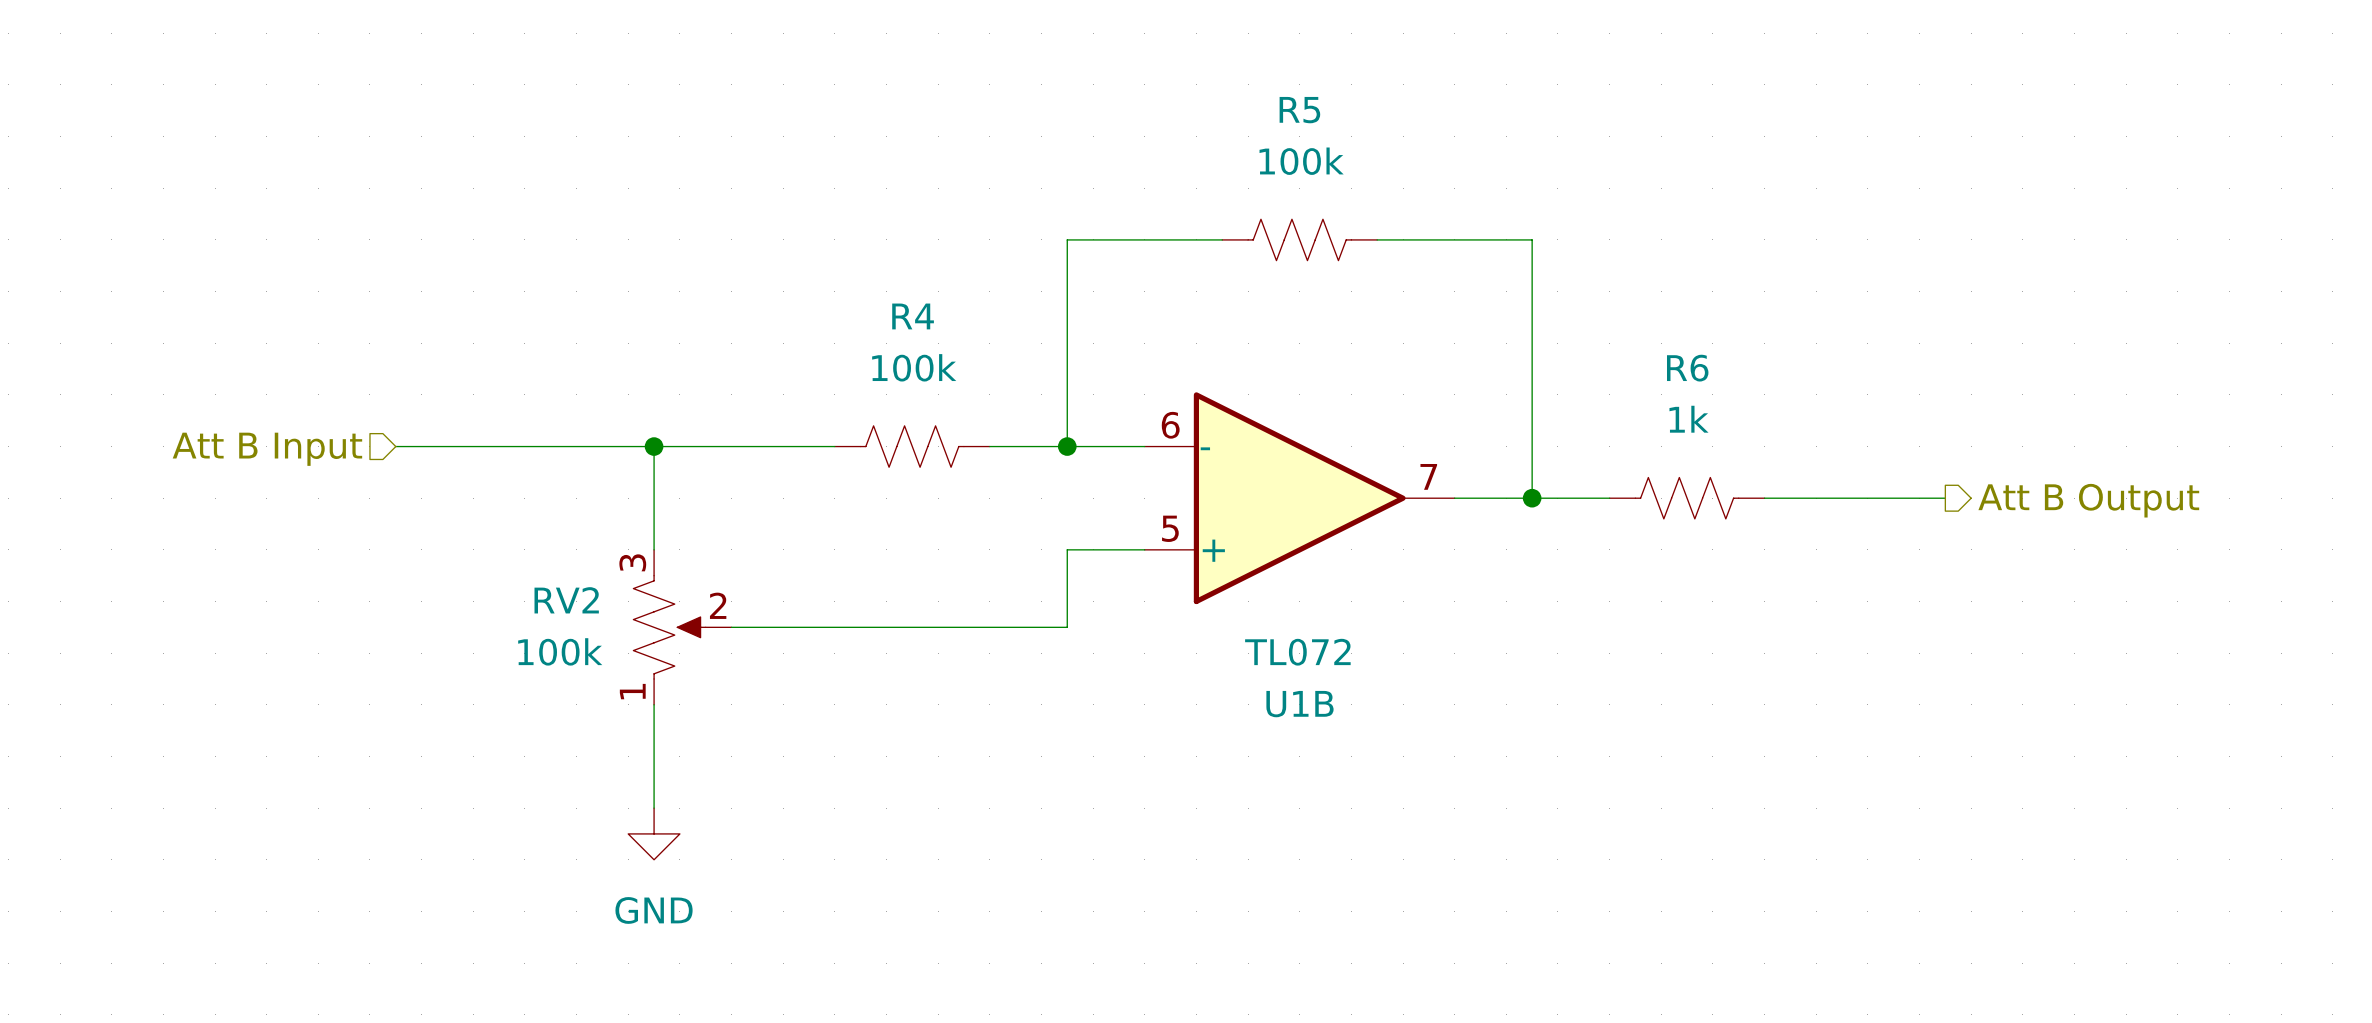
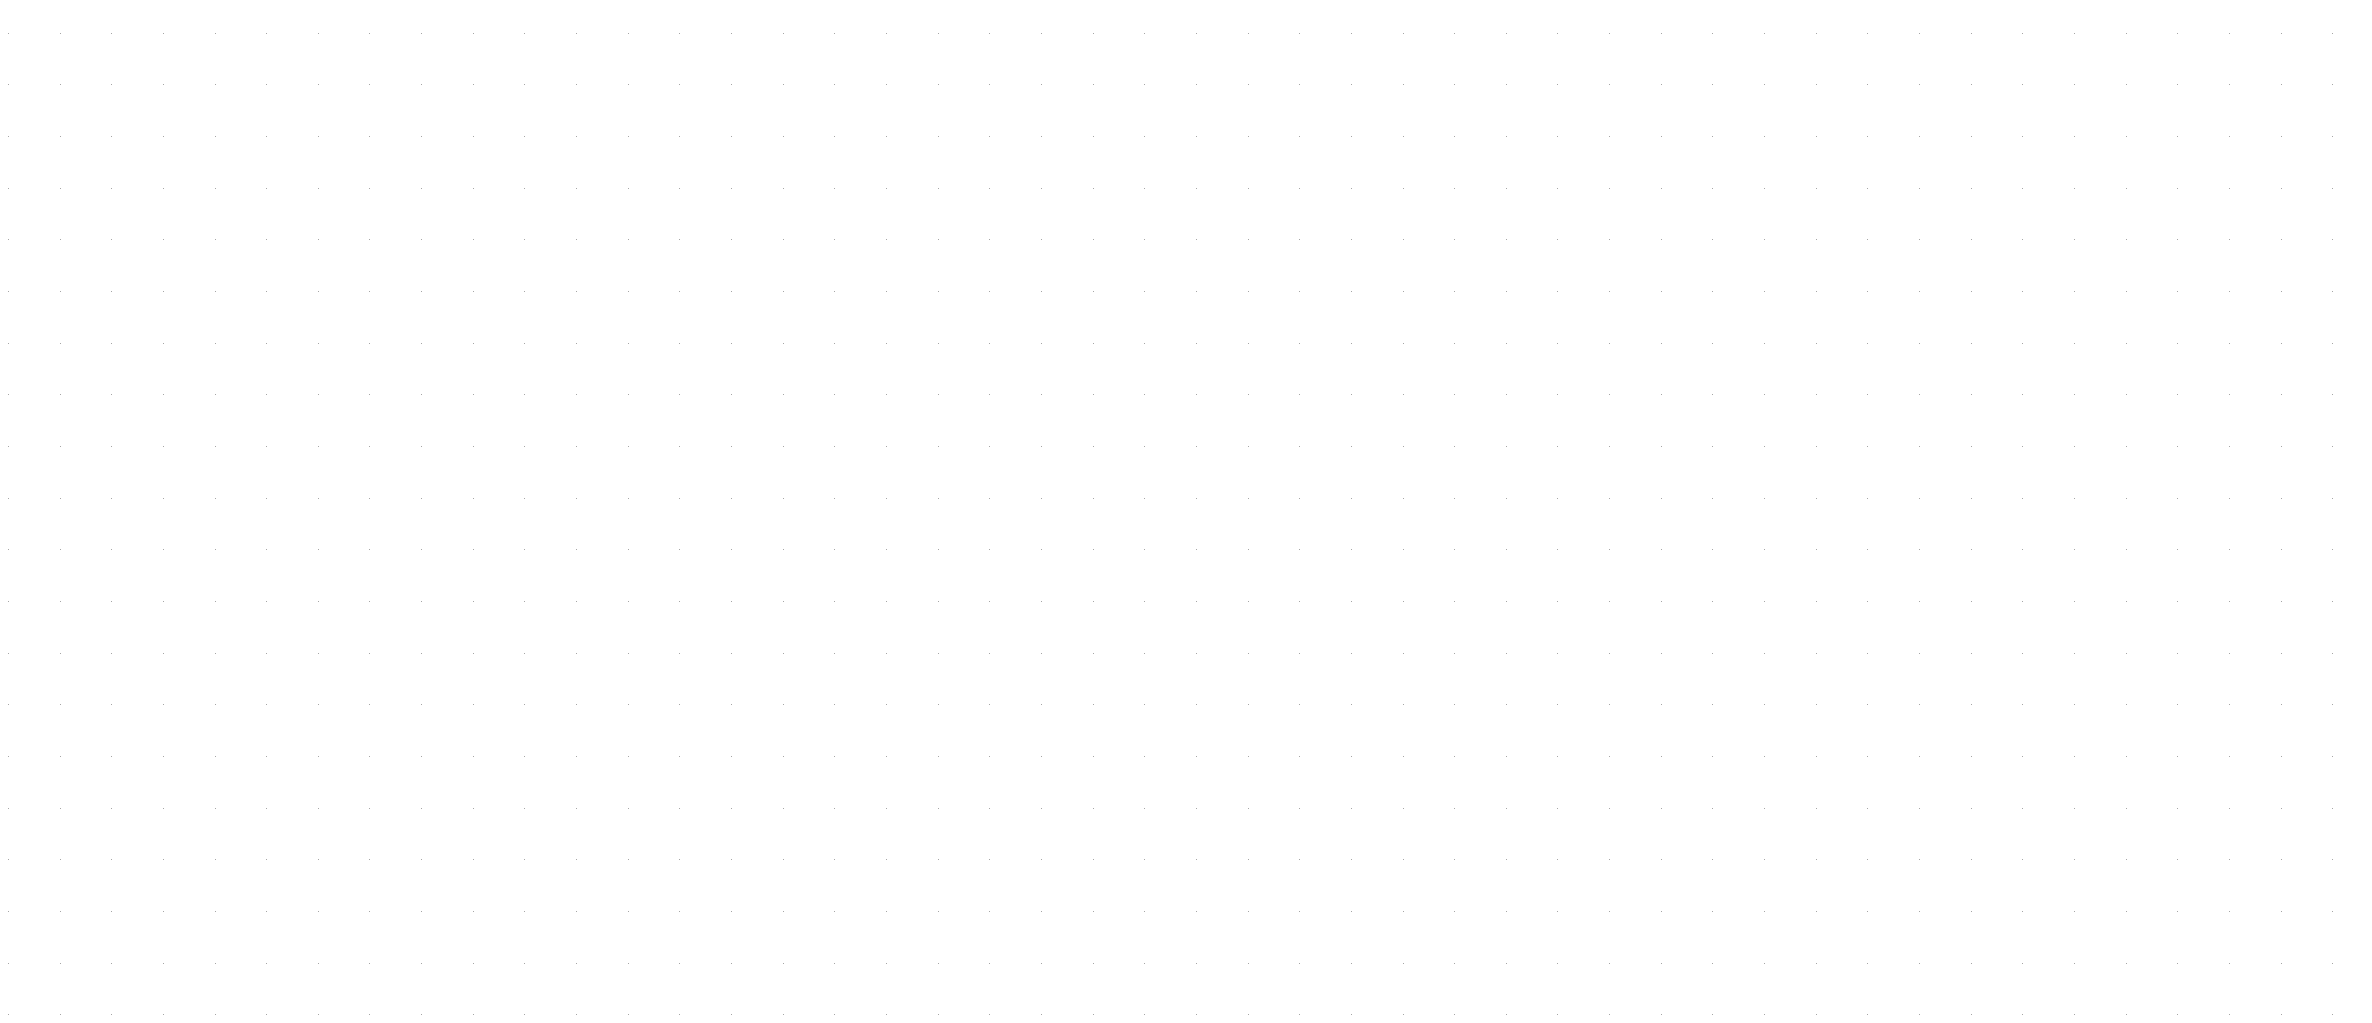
wire: (1222, 239) (1067, 239) (1067, 446) -> none
R5: 100k (1299, 239) -> none
wire: (1377, 239) (1532, 239) (1532, 498) -> none
wire: (395, 446) (834, 446) -> none
wire: (654, 446) (654, 549) -> none
junction: (654, 446) -> none
R4: 100k (912, 446) -> none
wire: (989, 446) (1144, 446) -> none
junction: (1067, 446) -> none
hierarchical label: Att B Input (267, 449) -> none
U1B: TL072 (1299, 498) -> none
wire: (1454, 498) (1609, 498) -> none
junction: (1532, 498) -> none
R6: 1k (1687, 498) -> none
wire: (1764, 498) (1945, 498) -> none
hierarchical label: Att B Output (2088, 500) -> none
wire: (1144, 549) (1067, 549) (1067, 627) (731, 627) -> none
RV2: 100k (682, 627) -> none
wire: (654, 704) (654, 808) -> none
power symbol: GND (654, 833) -> none

